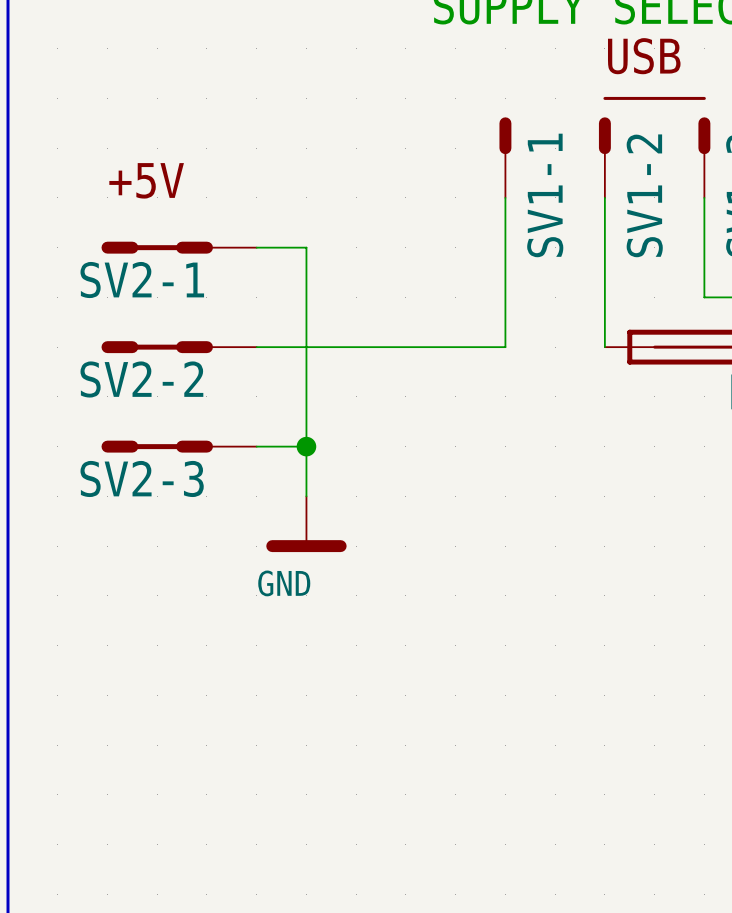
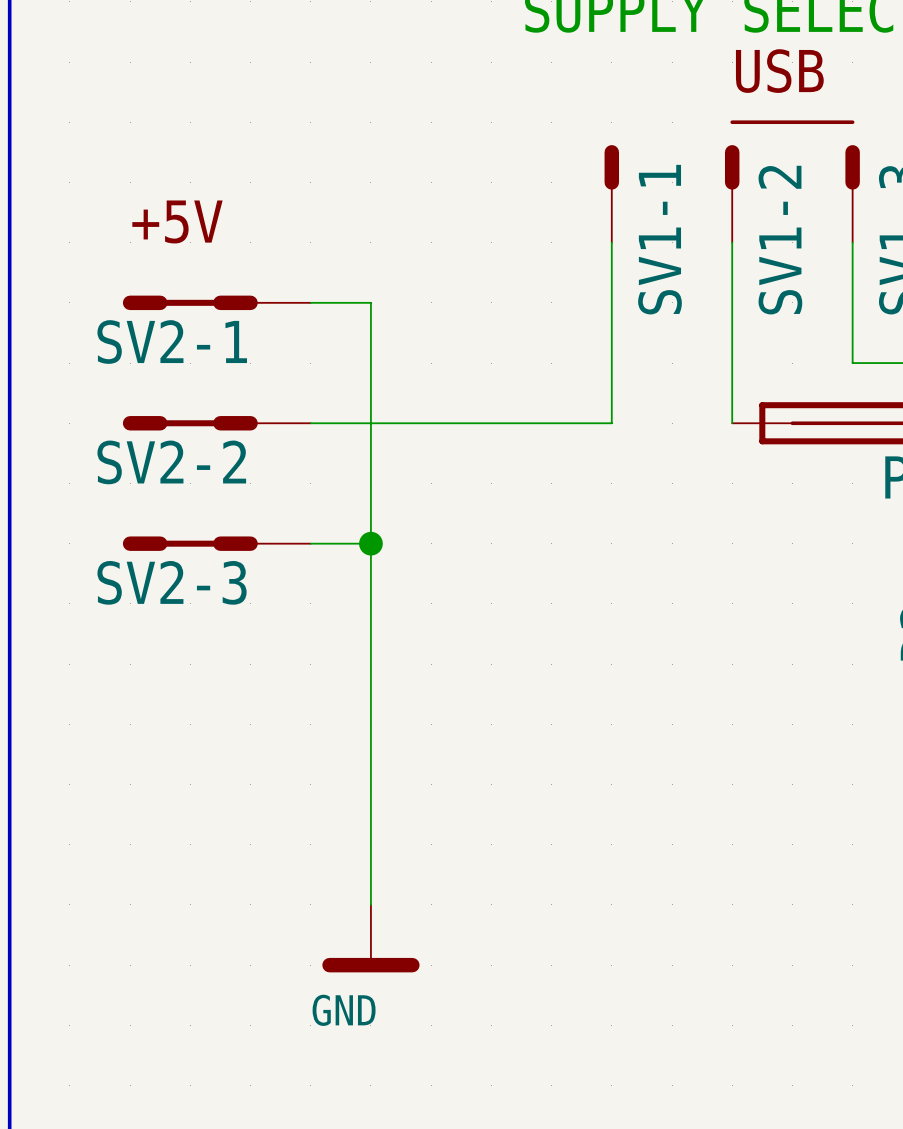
wire: none -> (370, 603) (370, 904)
power symbol position: (306, 524) -> (370, 938)

